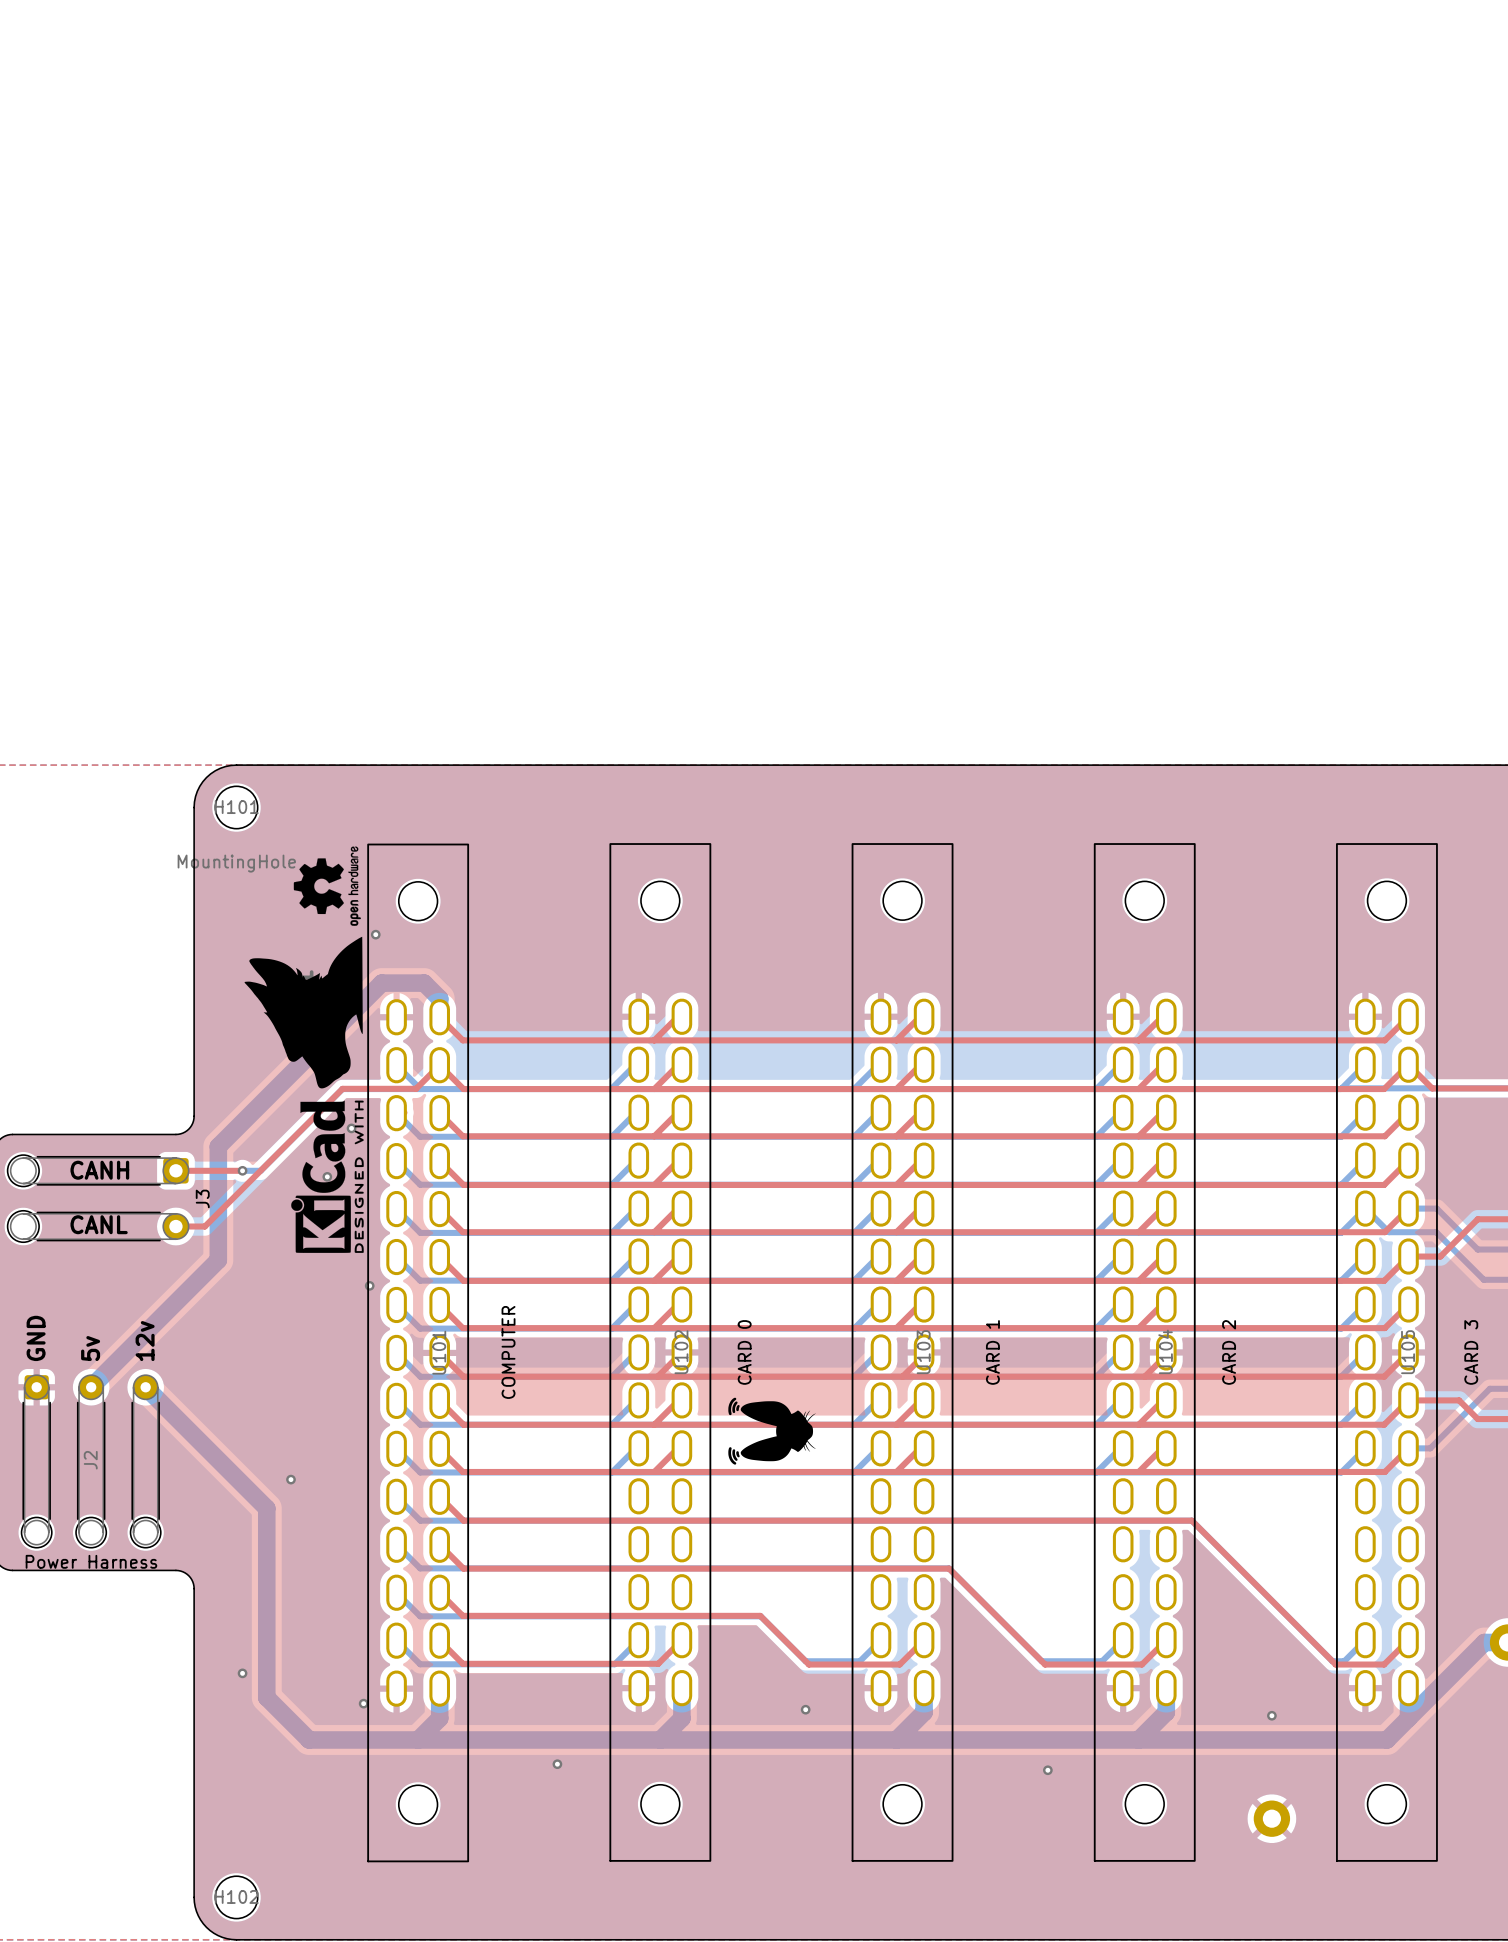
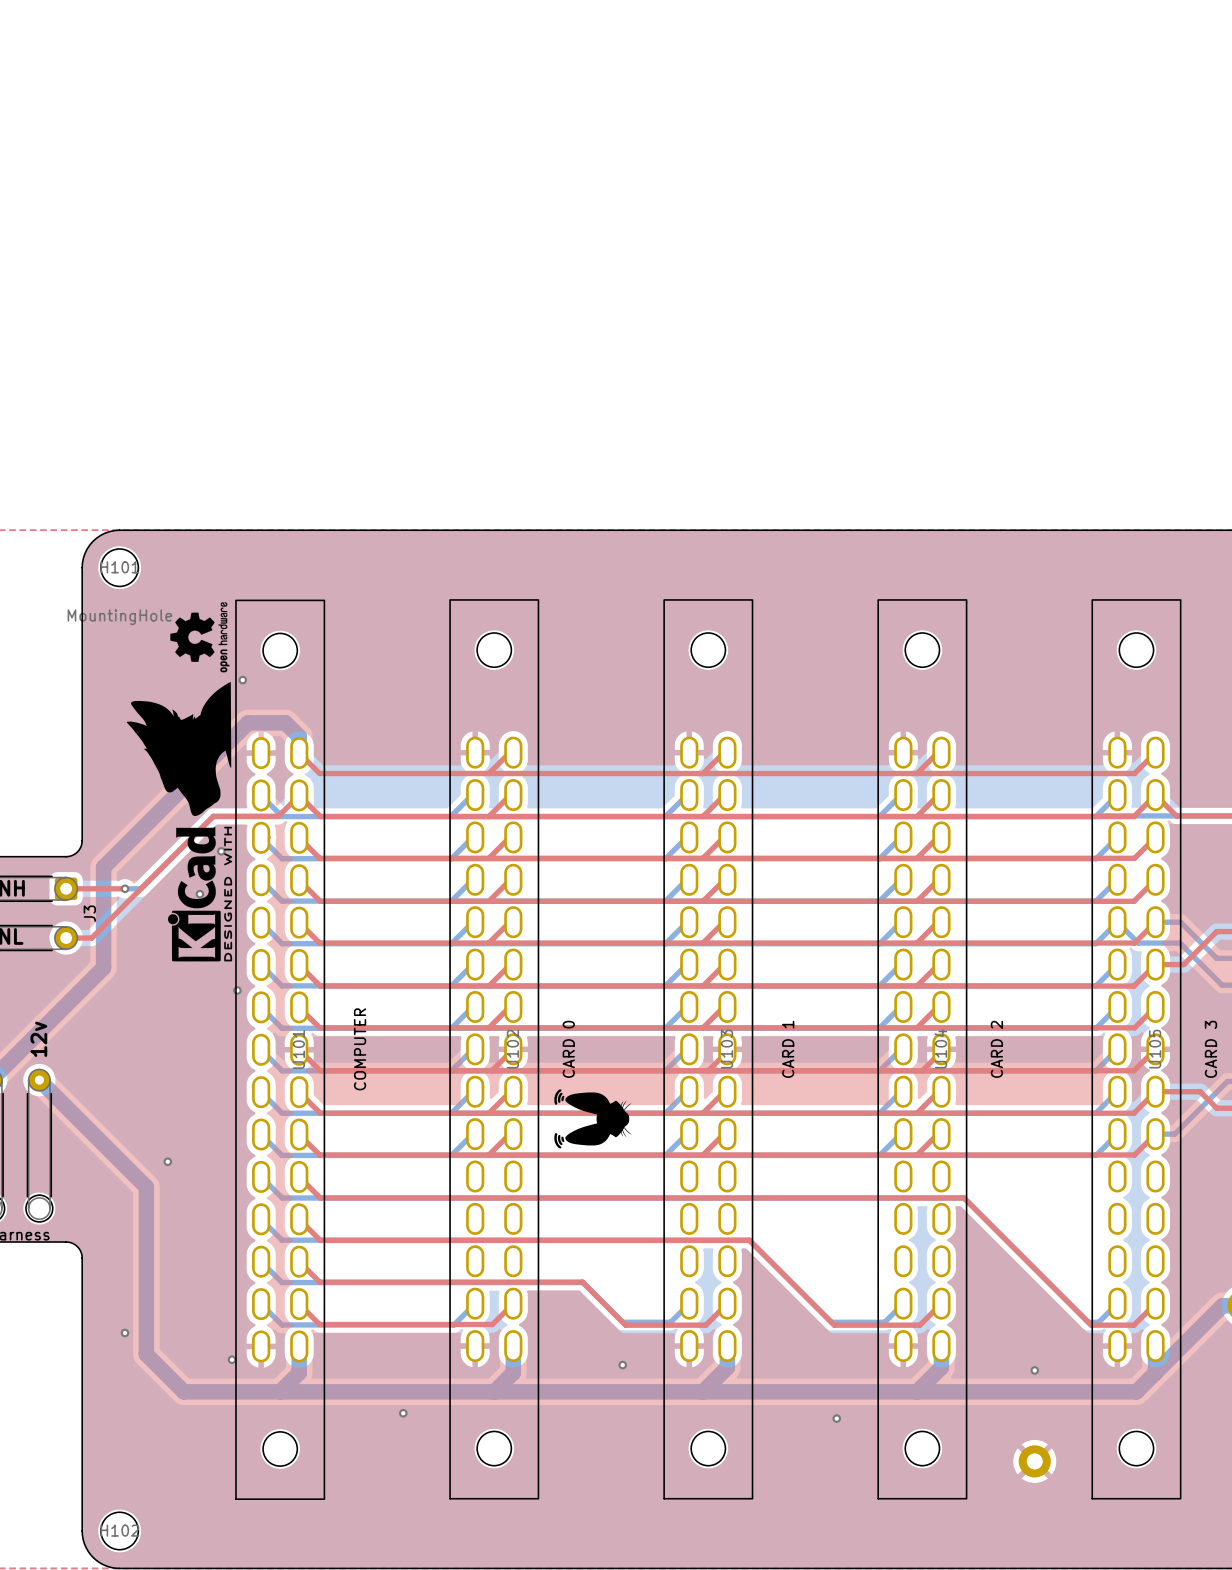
drawing: none -> [126, 681, 232, 816]
part: (303, 1012) -> none

